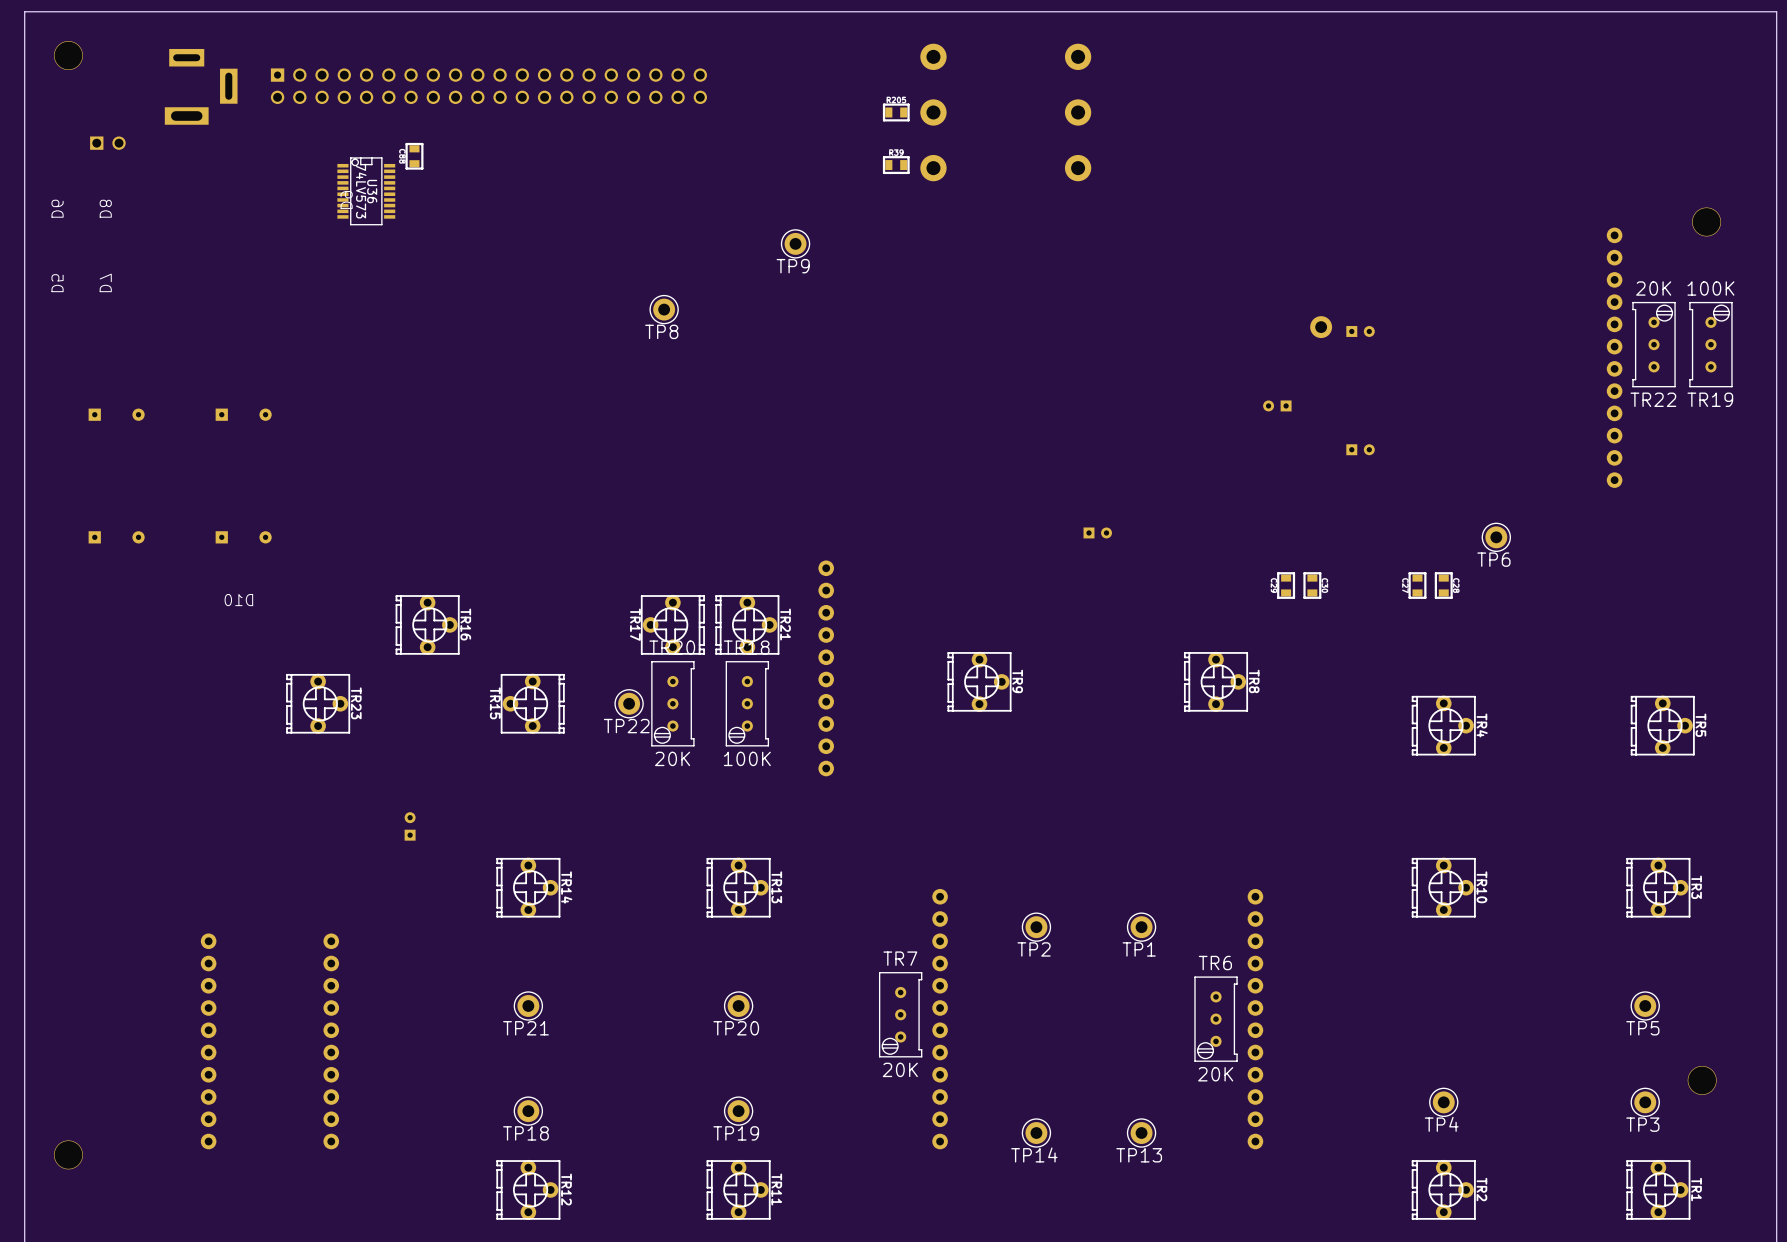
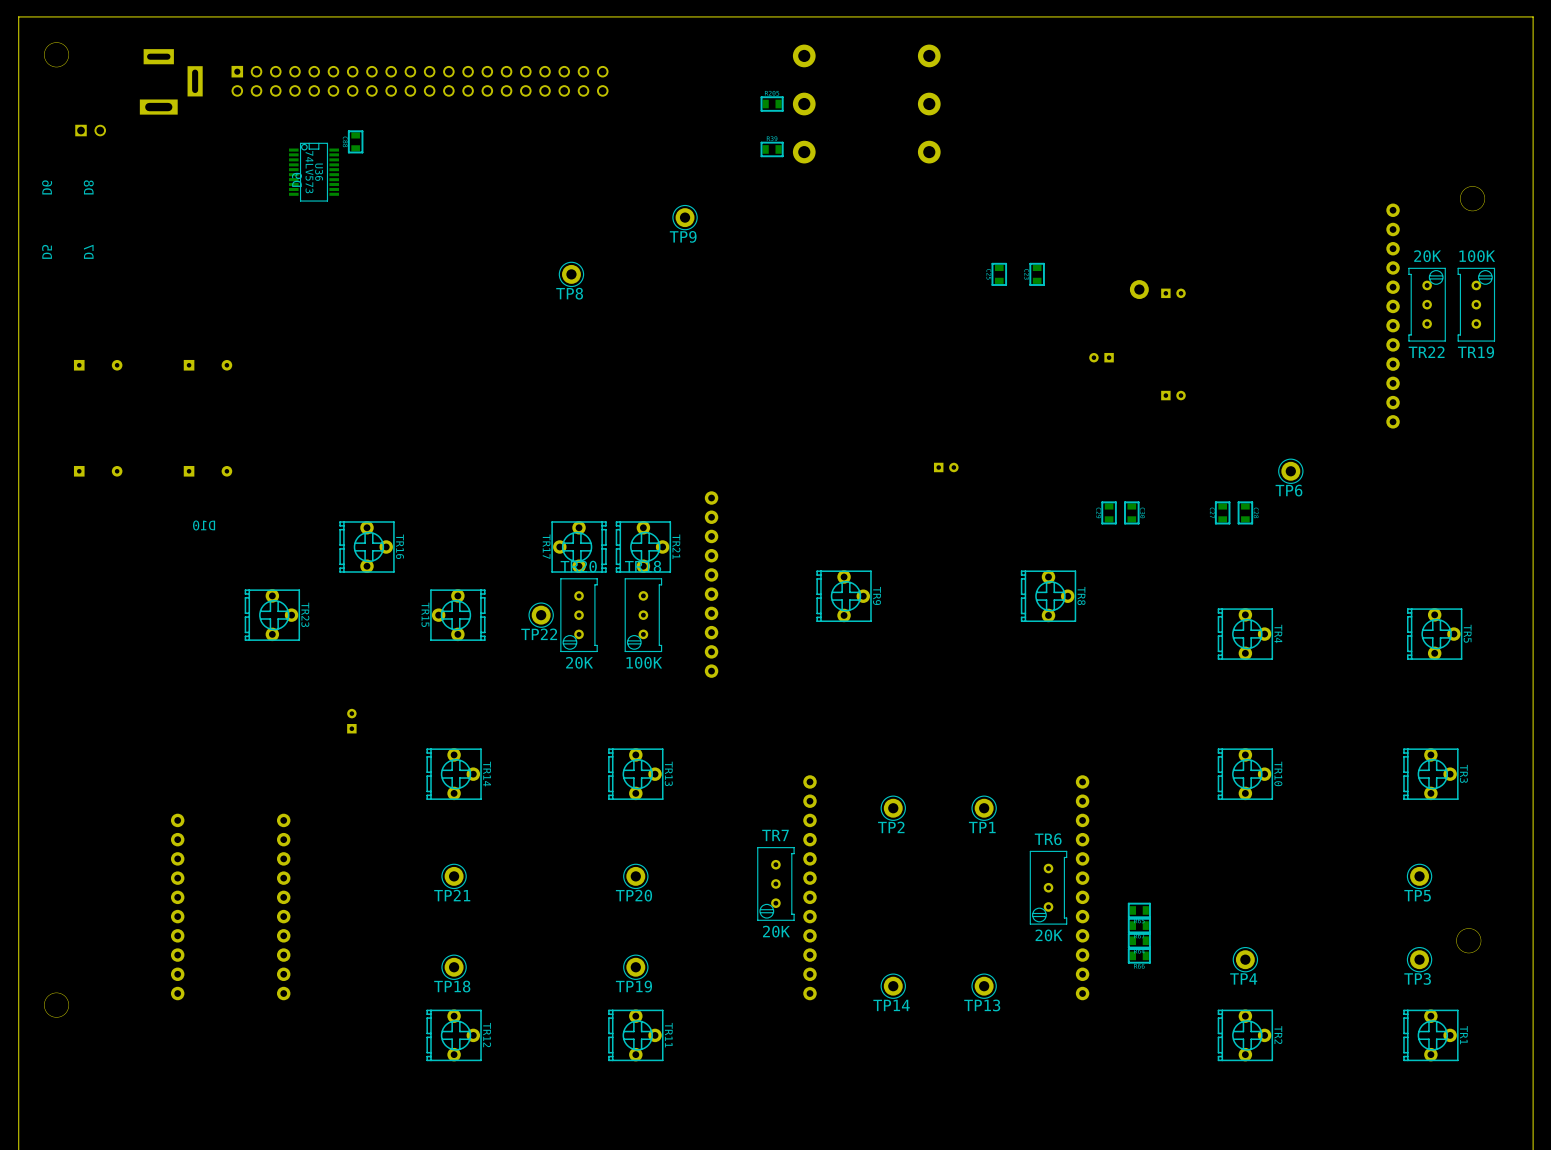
part: none -> (999, 274)
part: none -> (1037, 274)
part: none -> (1139, 910)
part: none -> (1139, 925)
part: none -> (1139, 940)
part: none -> (1139, 955)

